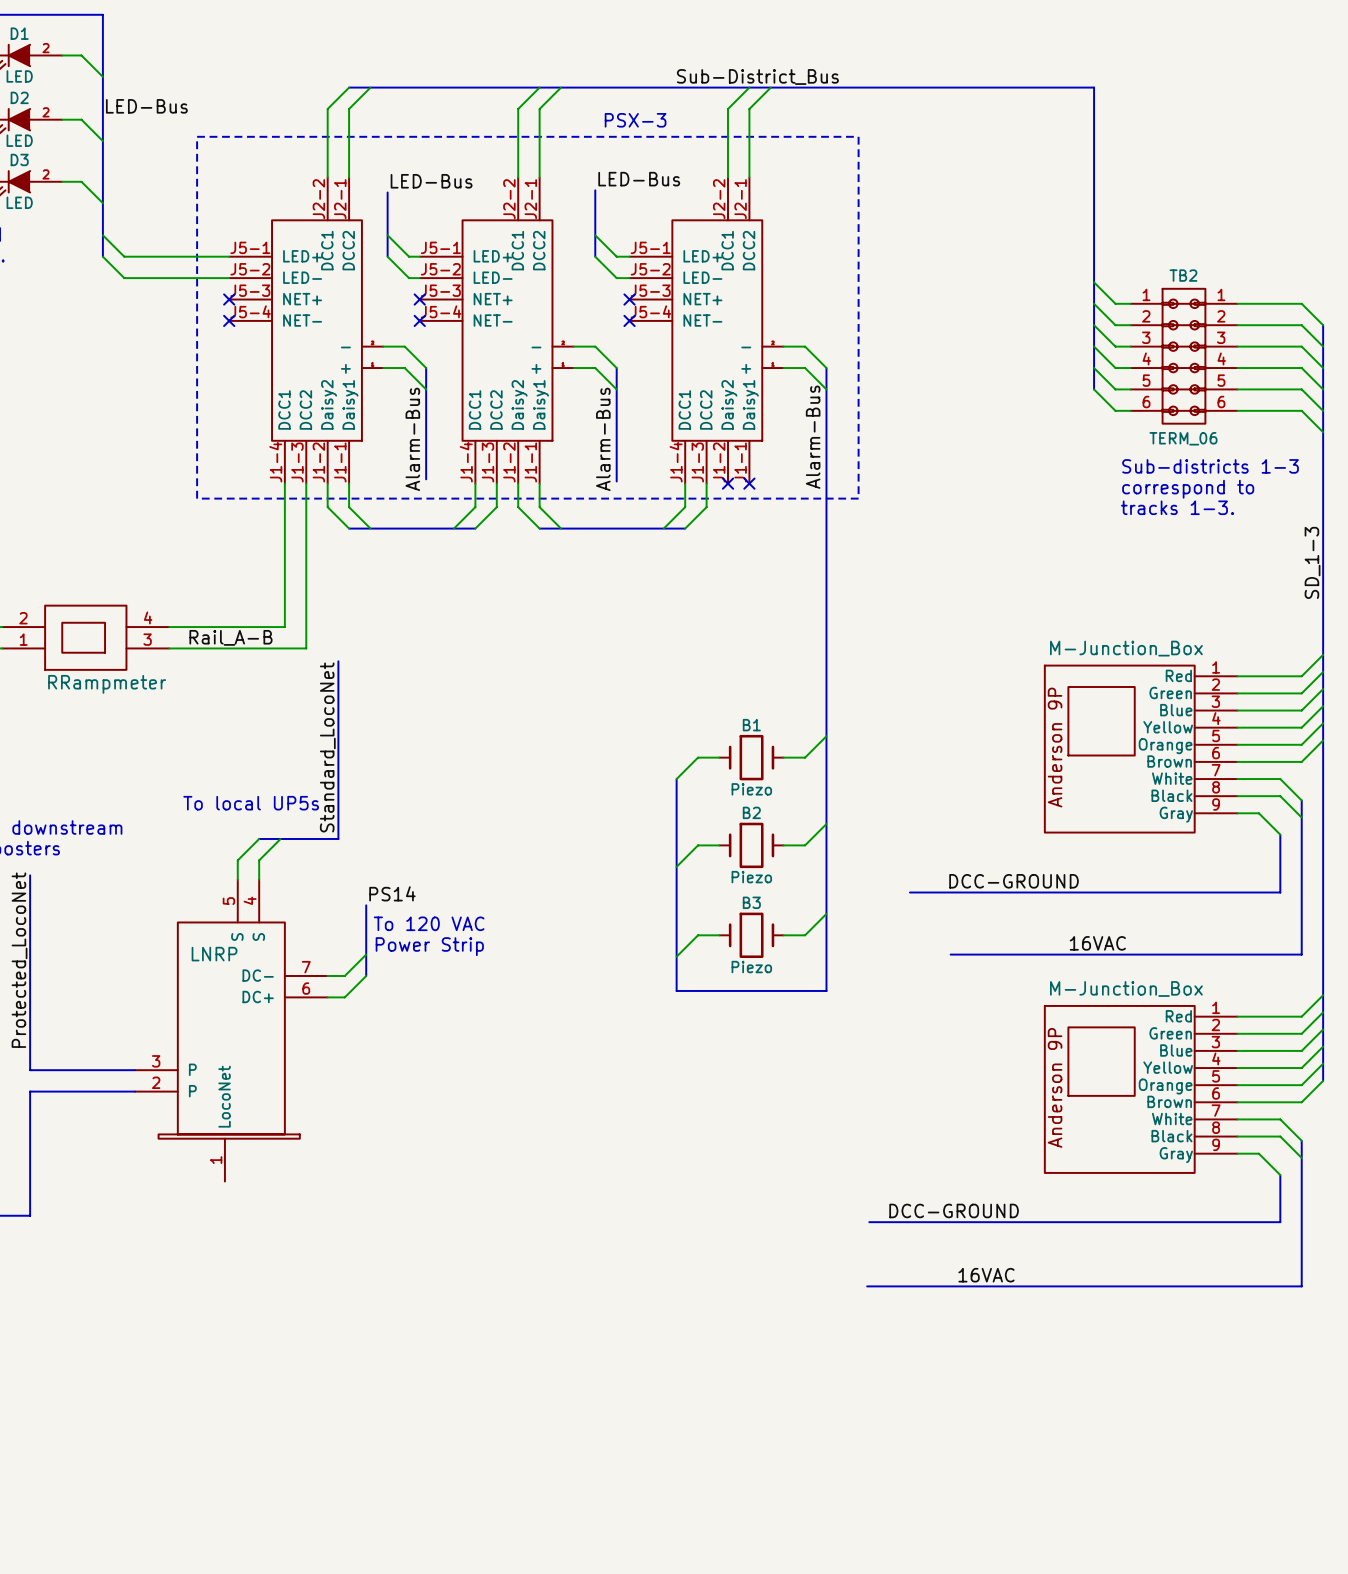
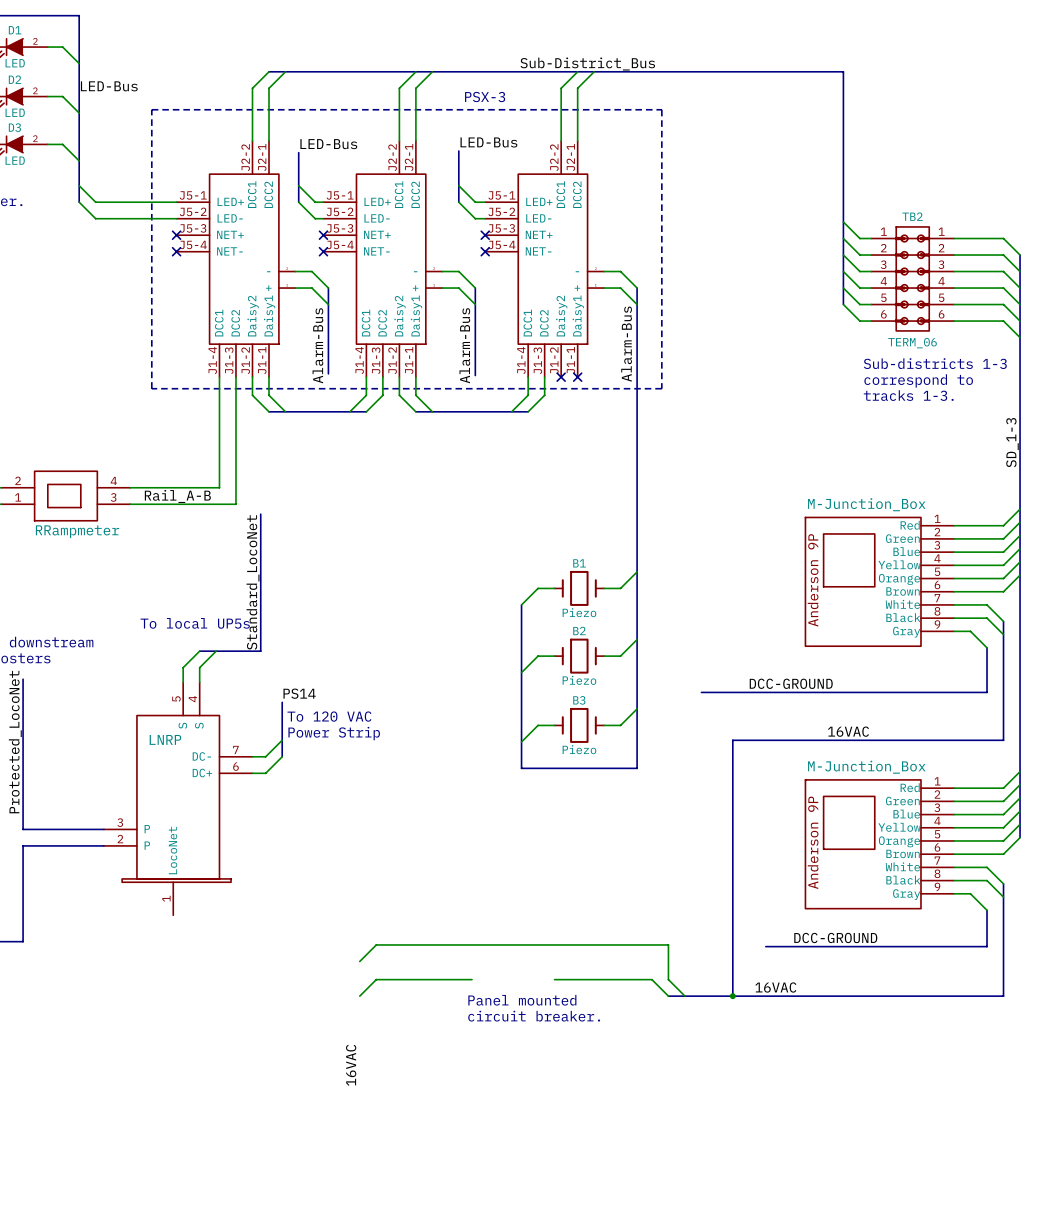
bus: none -> (732, 740) (732, 996)
label position: DCC-GROUND (954, 1210) -> DCC-GROUND (835, 937)
bus: (869, 1222) (993, 1222) -> none
wire: none -> (359, 961) (376, 944) (668, 944) (668, 979) (684, 996)
wire: none -> (472, 979) (376, 979) (359, 996)
wire: none -> (554, 979) (651, 979) (668, 996)
label position: 16VAC (986, 1275) -> 16VAC (775, 987)
junction: none -> (732, 996)
text: none -> Panel mounted (522, 1000)
text: none -> circuit breaker. (534, 1016)
label: none -> 16VAC (351, 1065)

